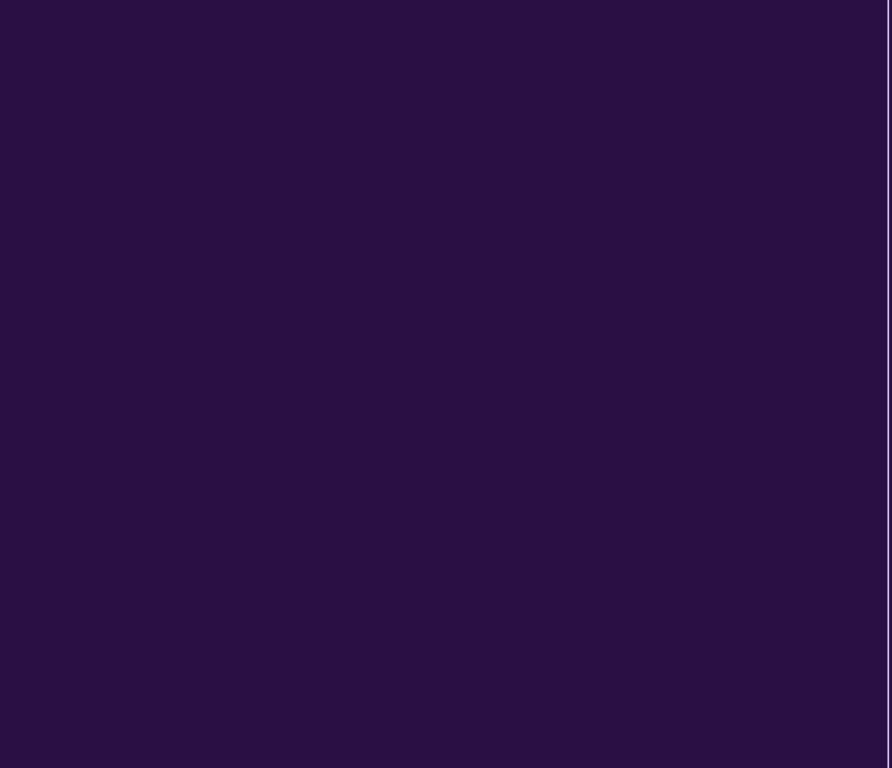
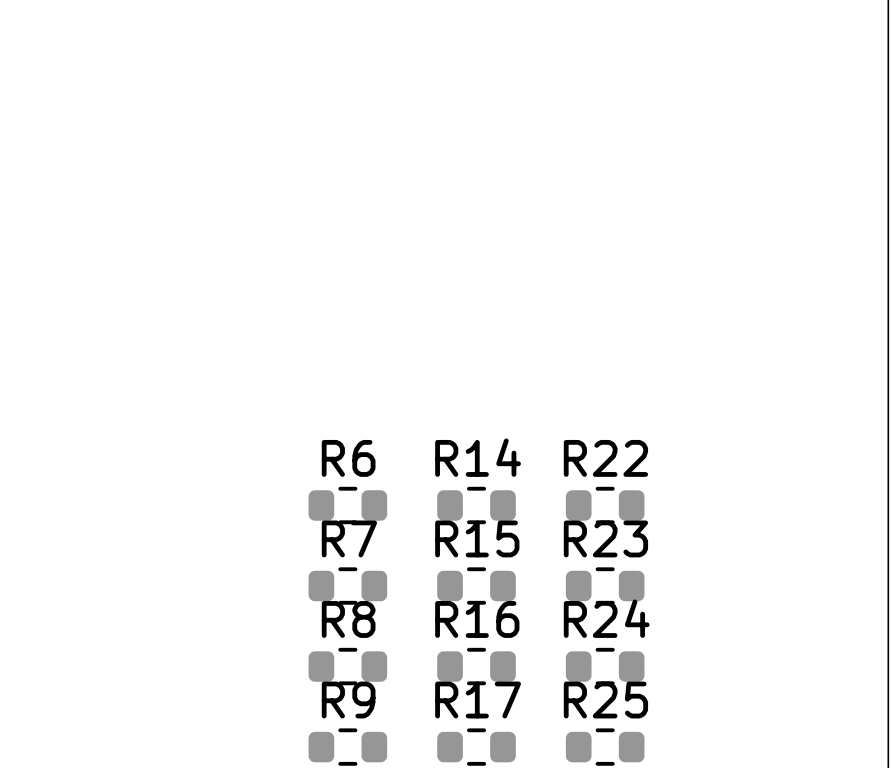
R6: none -> (347, 505)
R14: none -> (476, 505)
R22: none -> (605, 505)
R7: none -> (347, 586)
R15: none -> (476, 586)
R23: none -> (605, 586)
R8: none -> (347, 666)
R16: none -> (476, 666)
R24: none -> (605, 666)
R9: none -> (347, 747)
R17: none -> (476, 747)
R25: none -> (605, 747)

